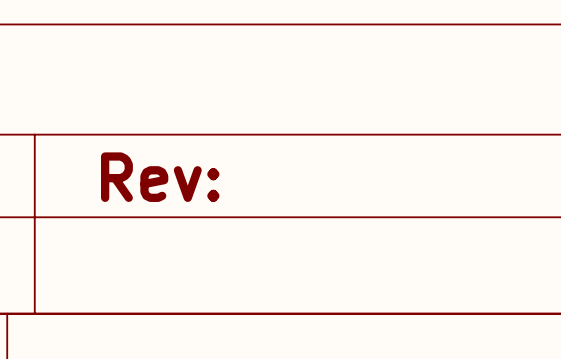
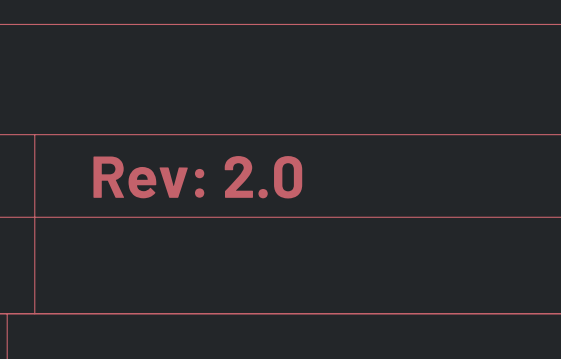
title block: Rev: (160, 177) -> Rev: 2.0 (197, 177)

